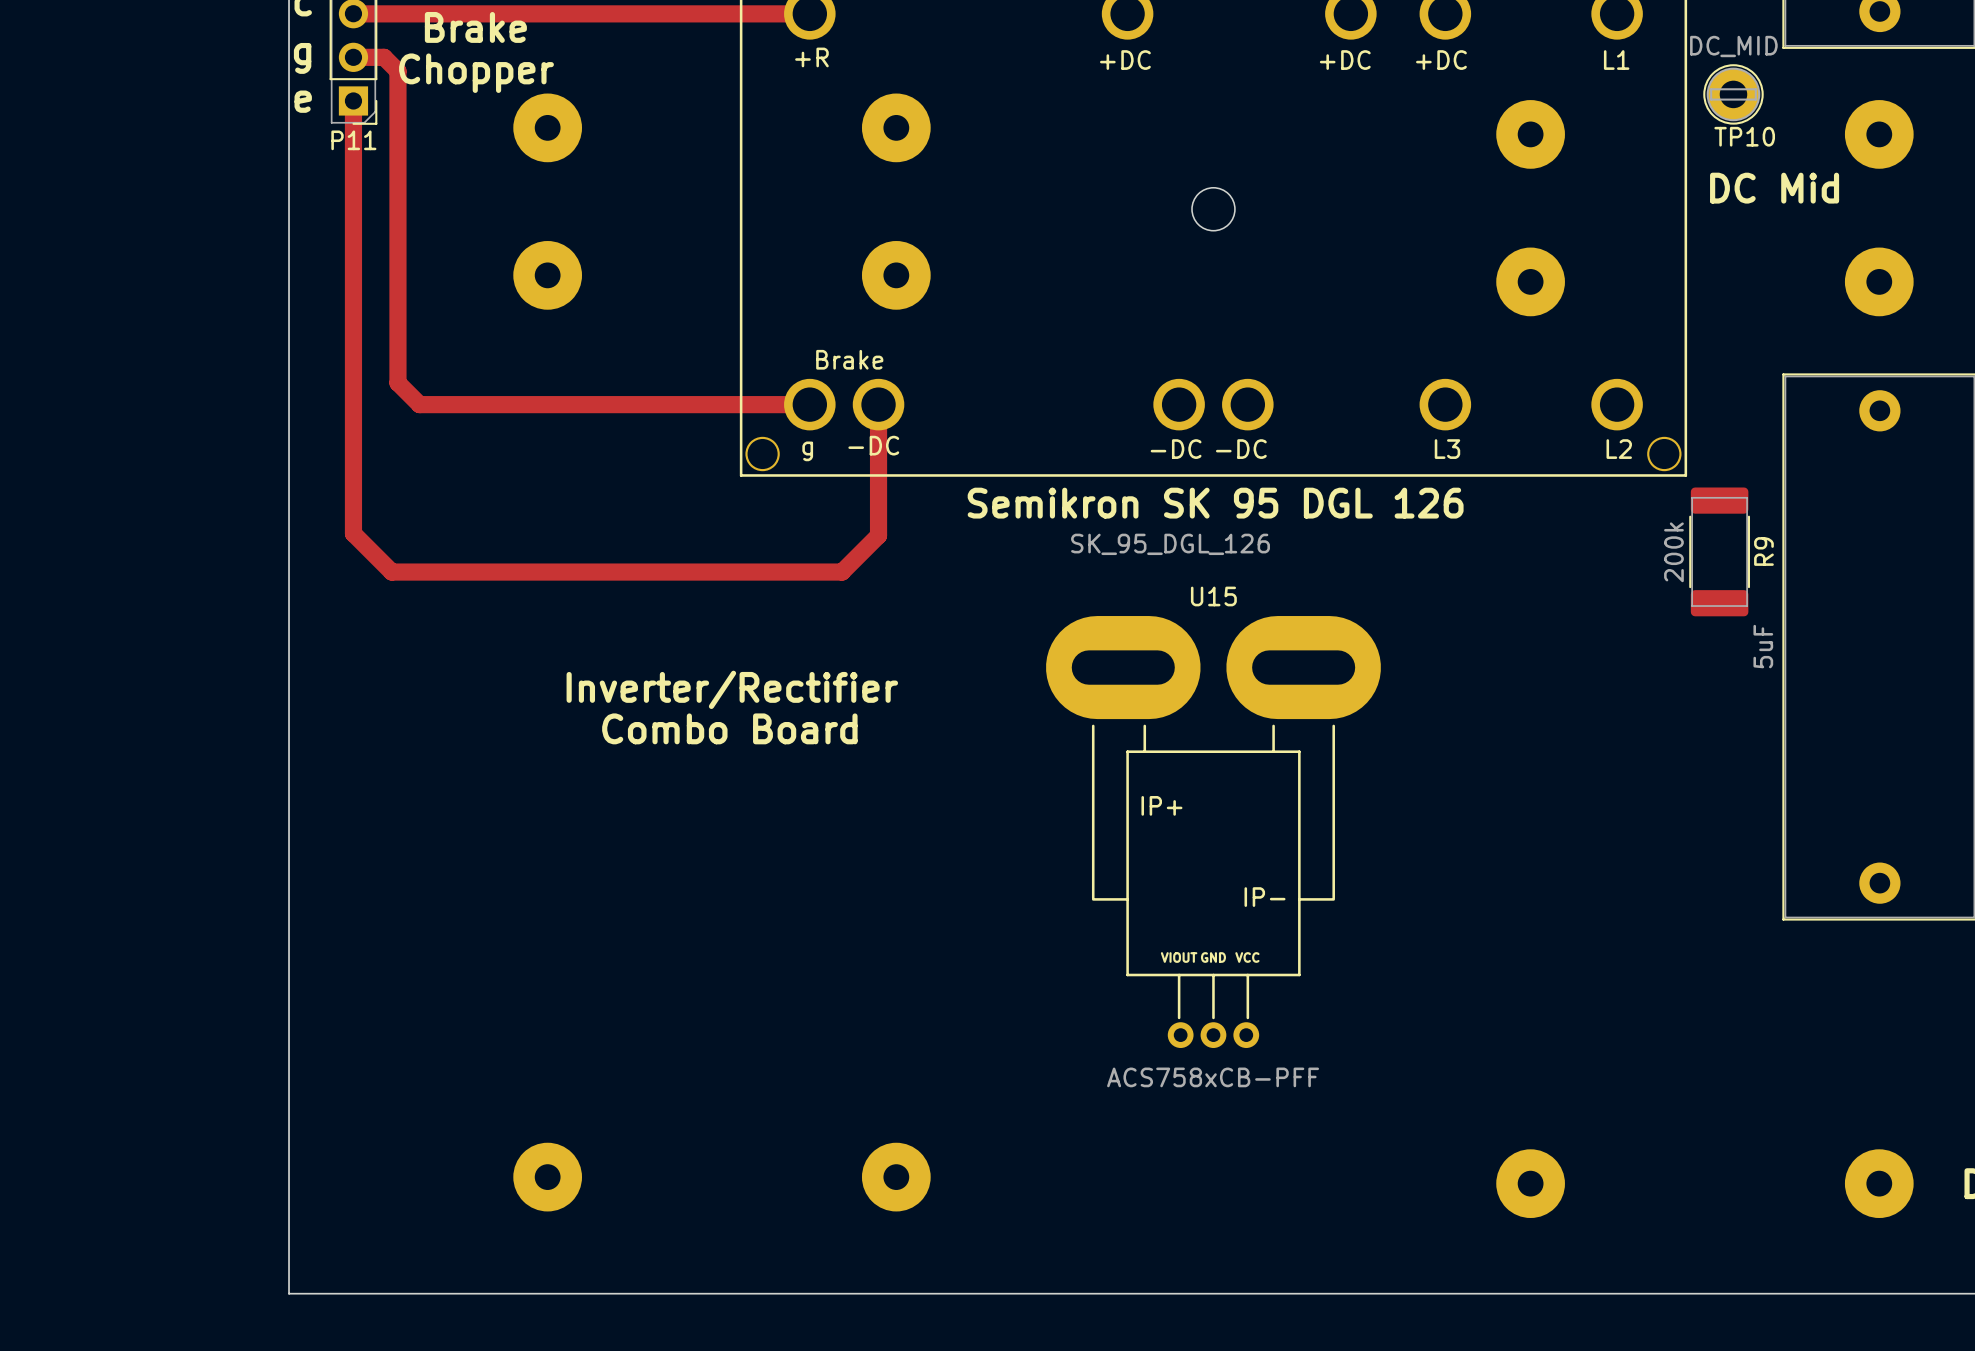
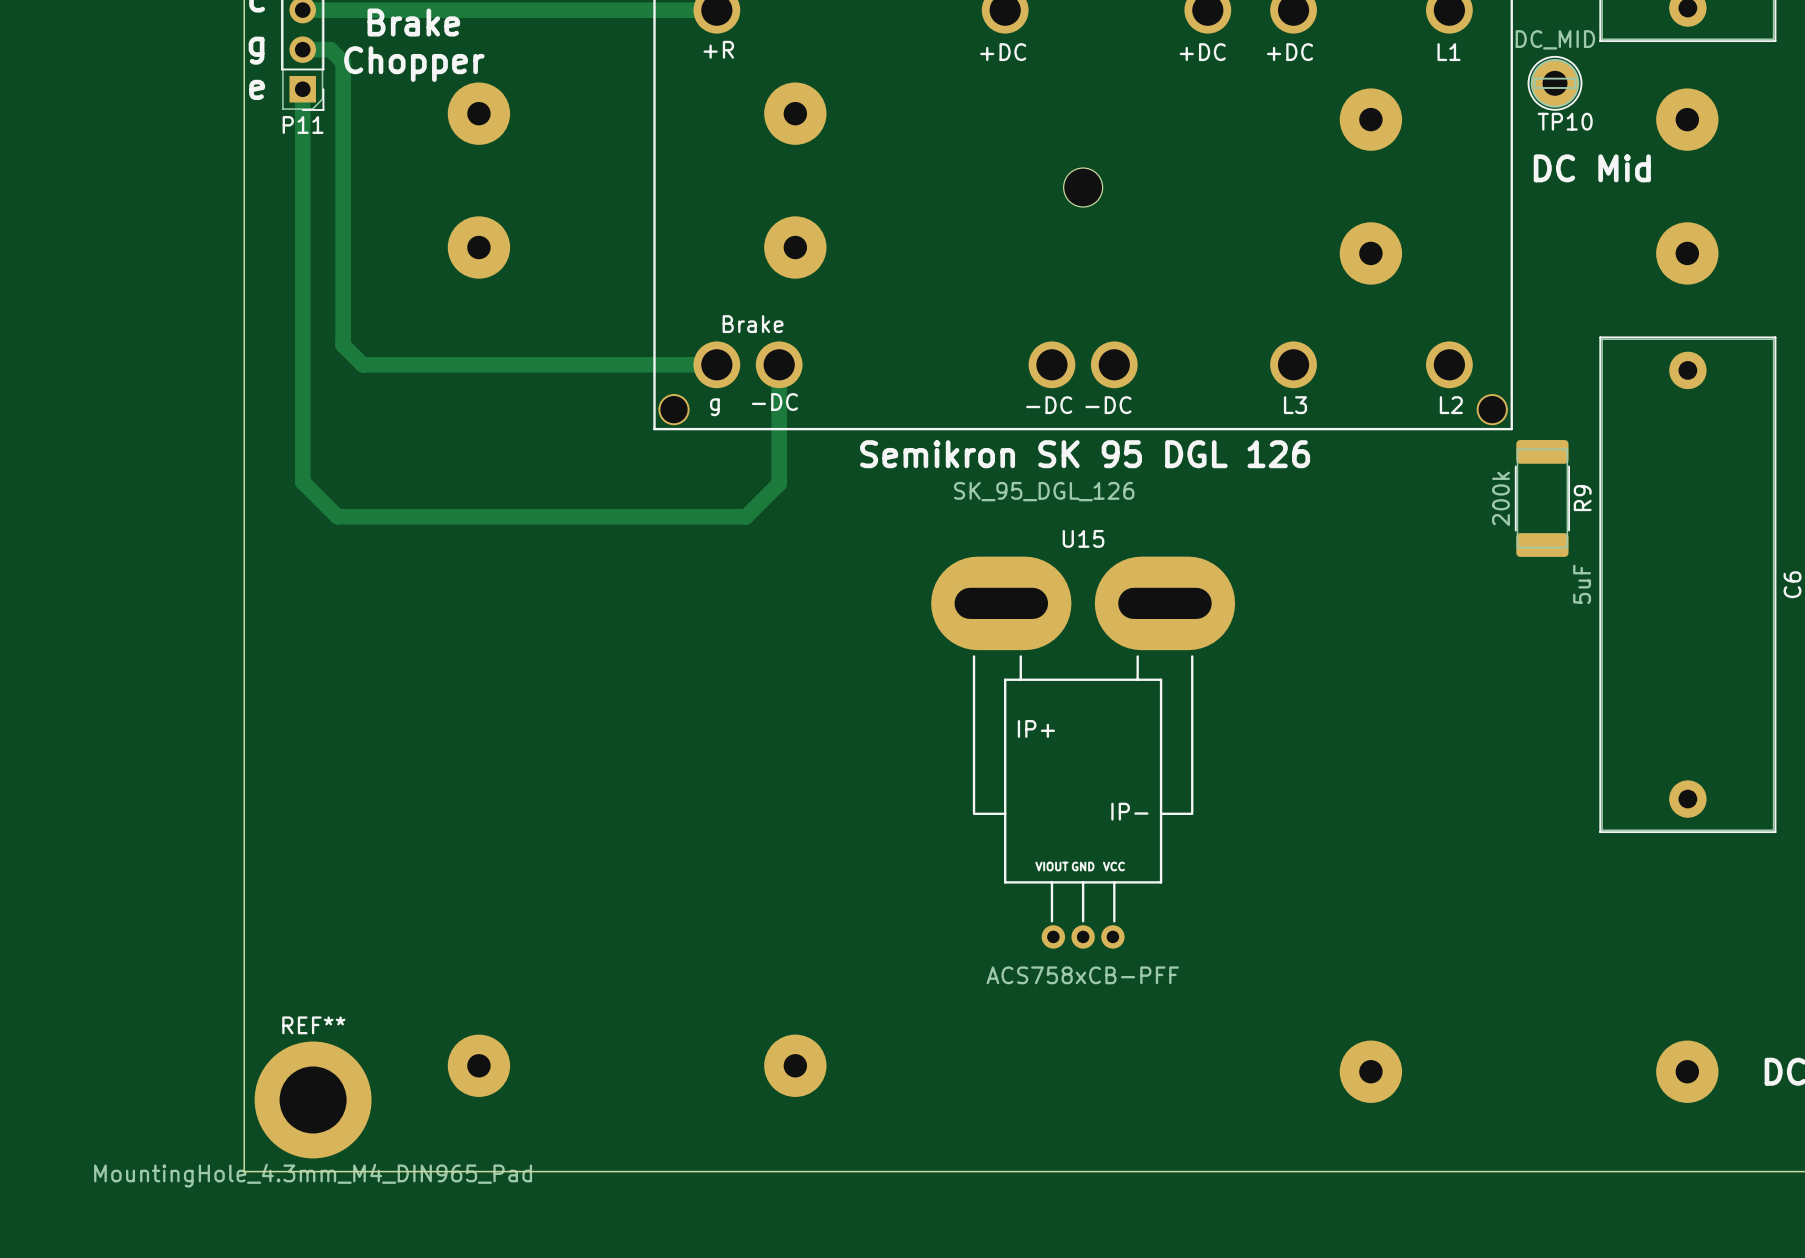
text: Inverter/Rectifier (732, 689) -> none
text: Combo Board (729, 728) -> none
REF**: none -> MountingHole_4.3mm_M4_DIN965_Pad (313, 1099)

